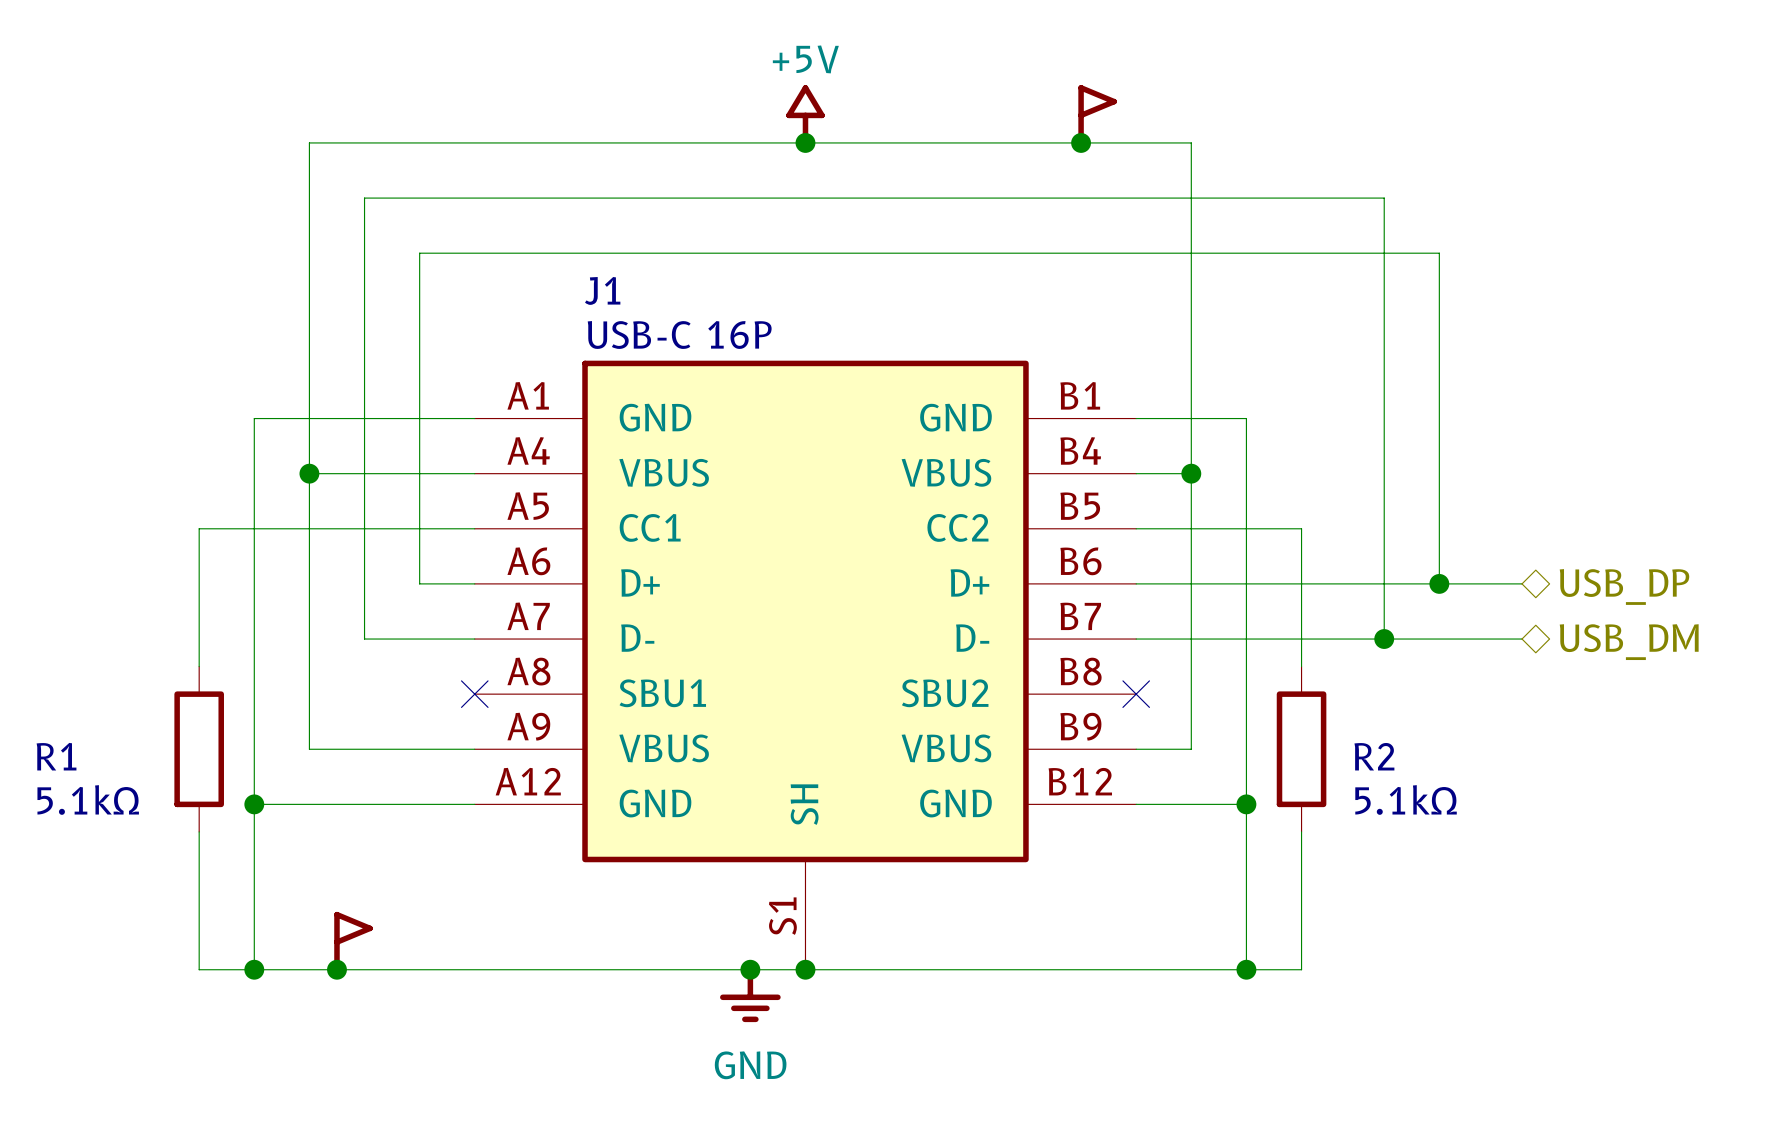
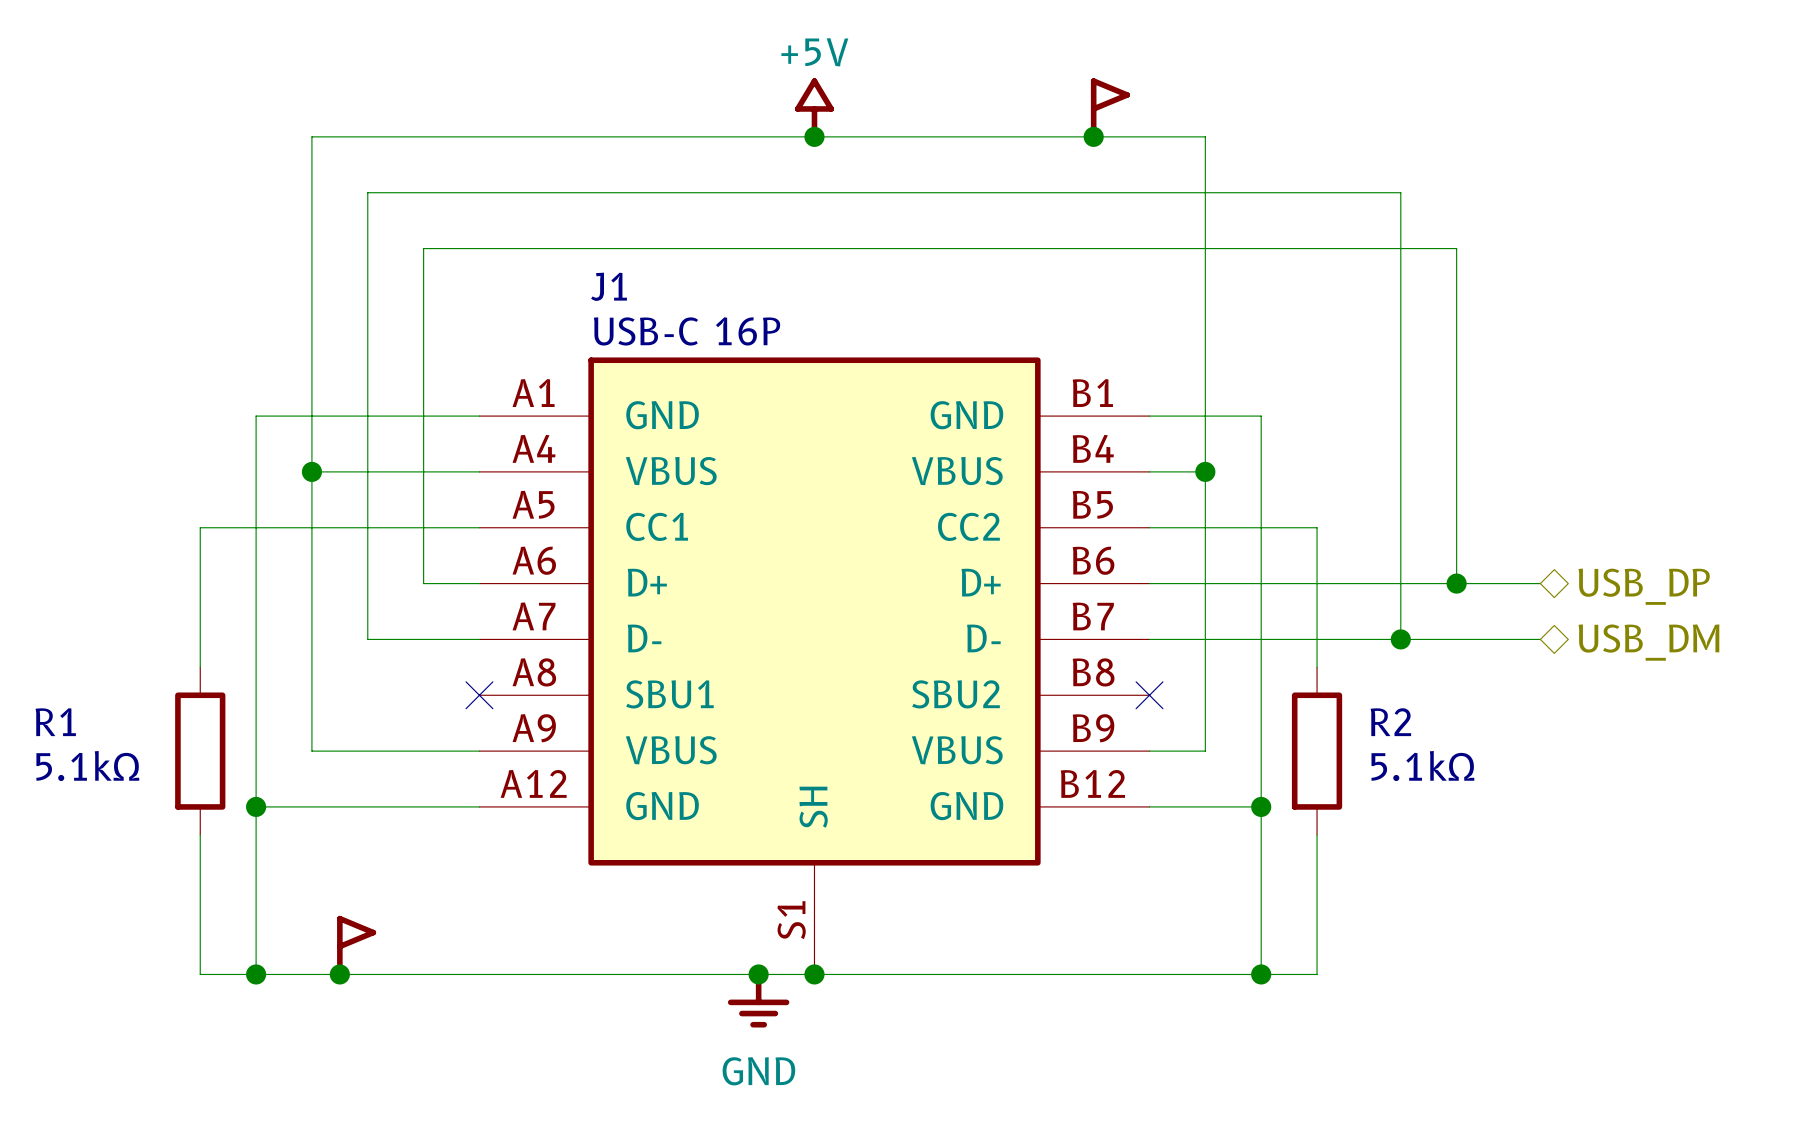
text position: R1 (56, 756) -> R1 (55, 722)
text position: R2 (1374, 756) -> R2 (1390, 722)
text position: 5.1kΩ (88, 799) -> 5.1kΩ (87, 766)
text position: 5.1kΩ (1406, 799) -> 5.1kΩ (1422, 766)

